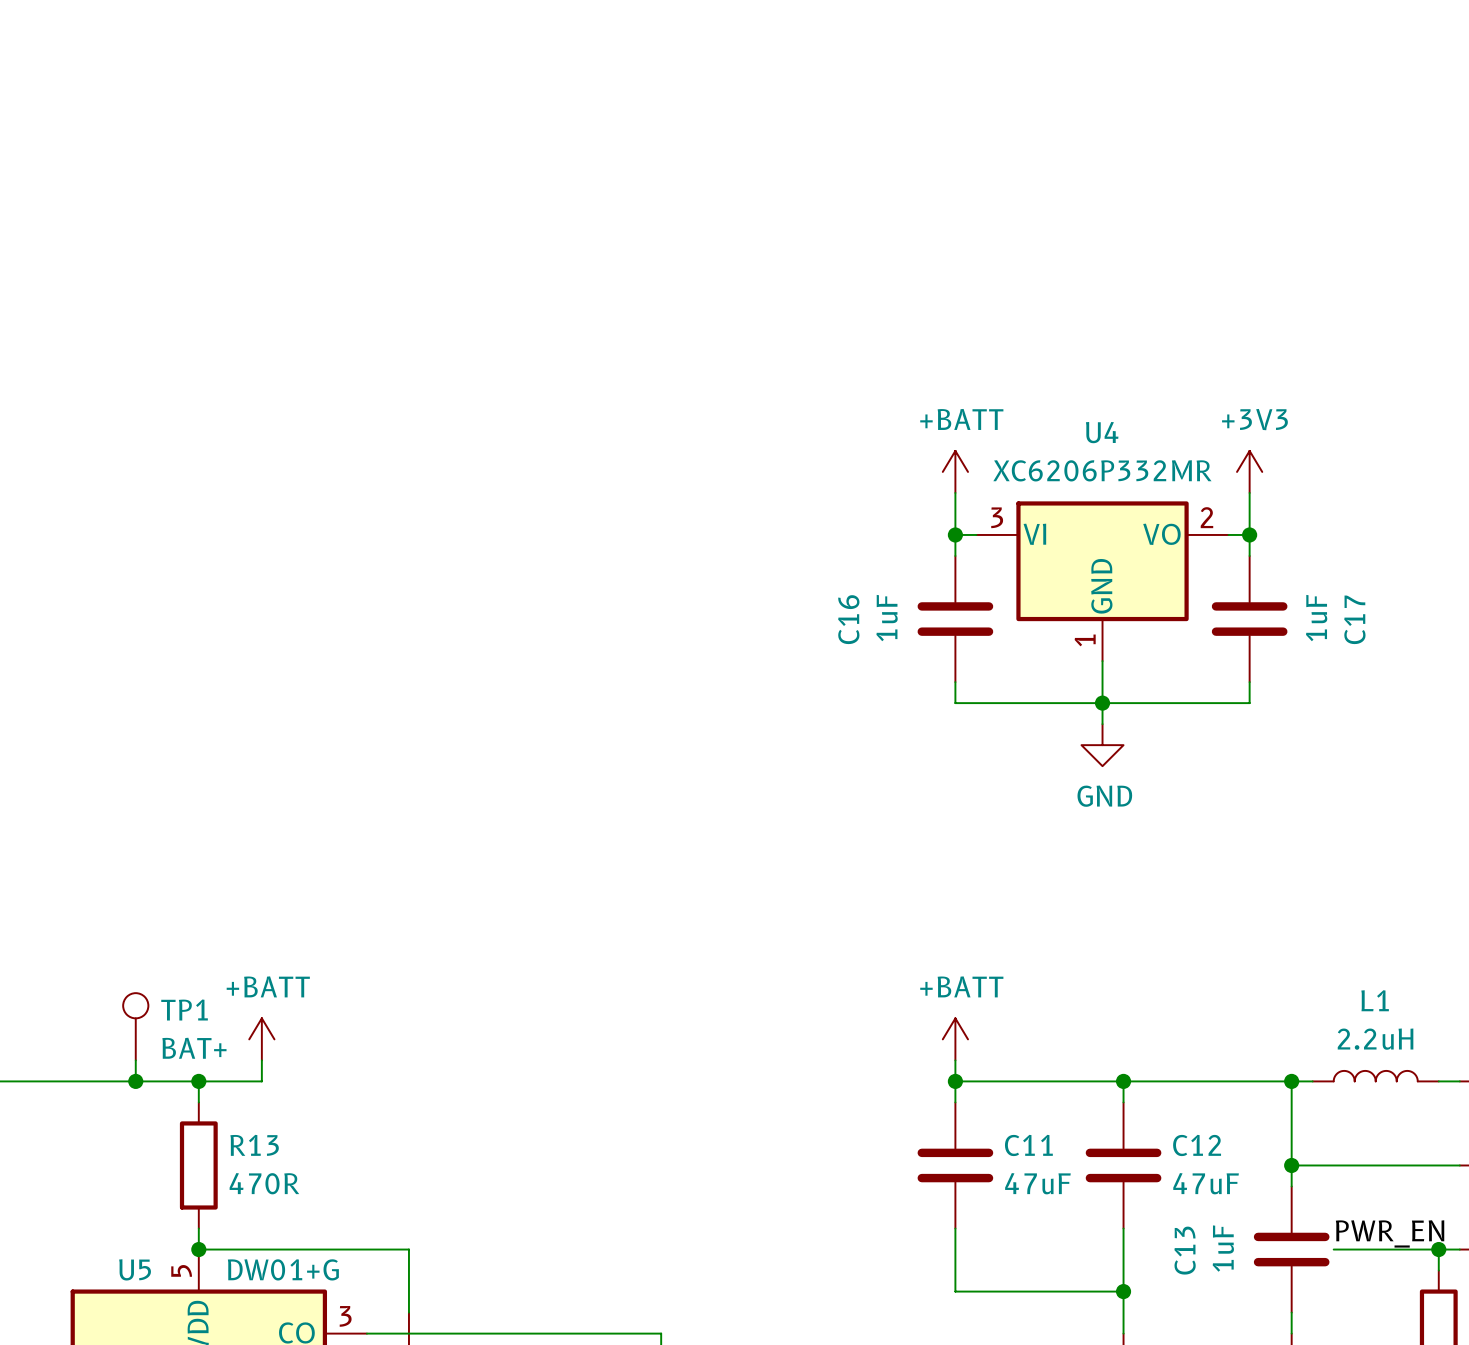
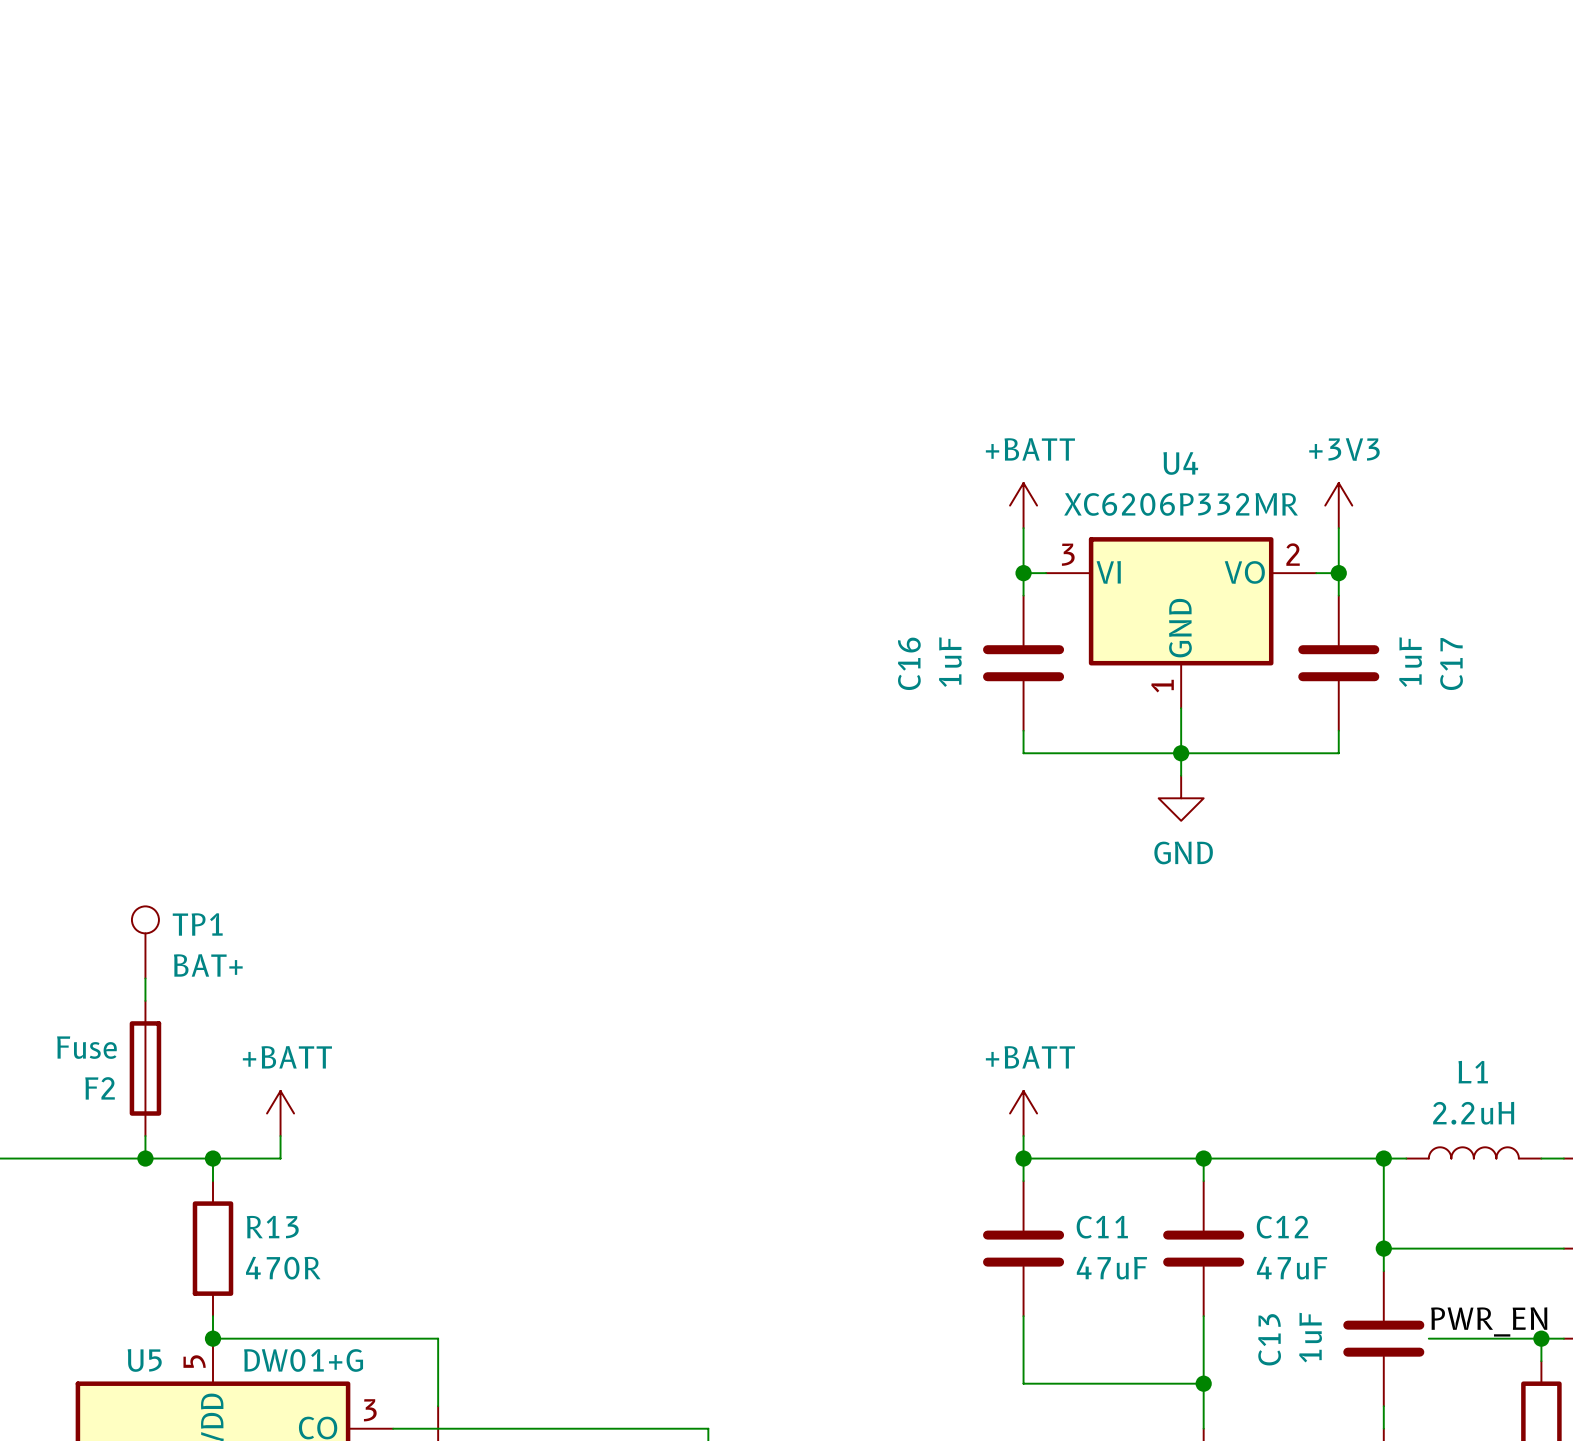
wire: none -> (145, 978) (145, 1000)
F2: none -> Fuse (145, 1068)
TP1 position: (135, 1026) -> (145, 942)

